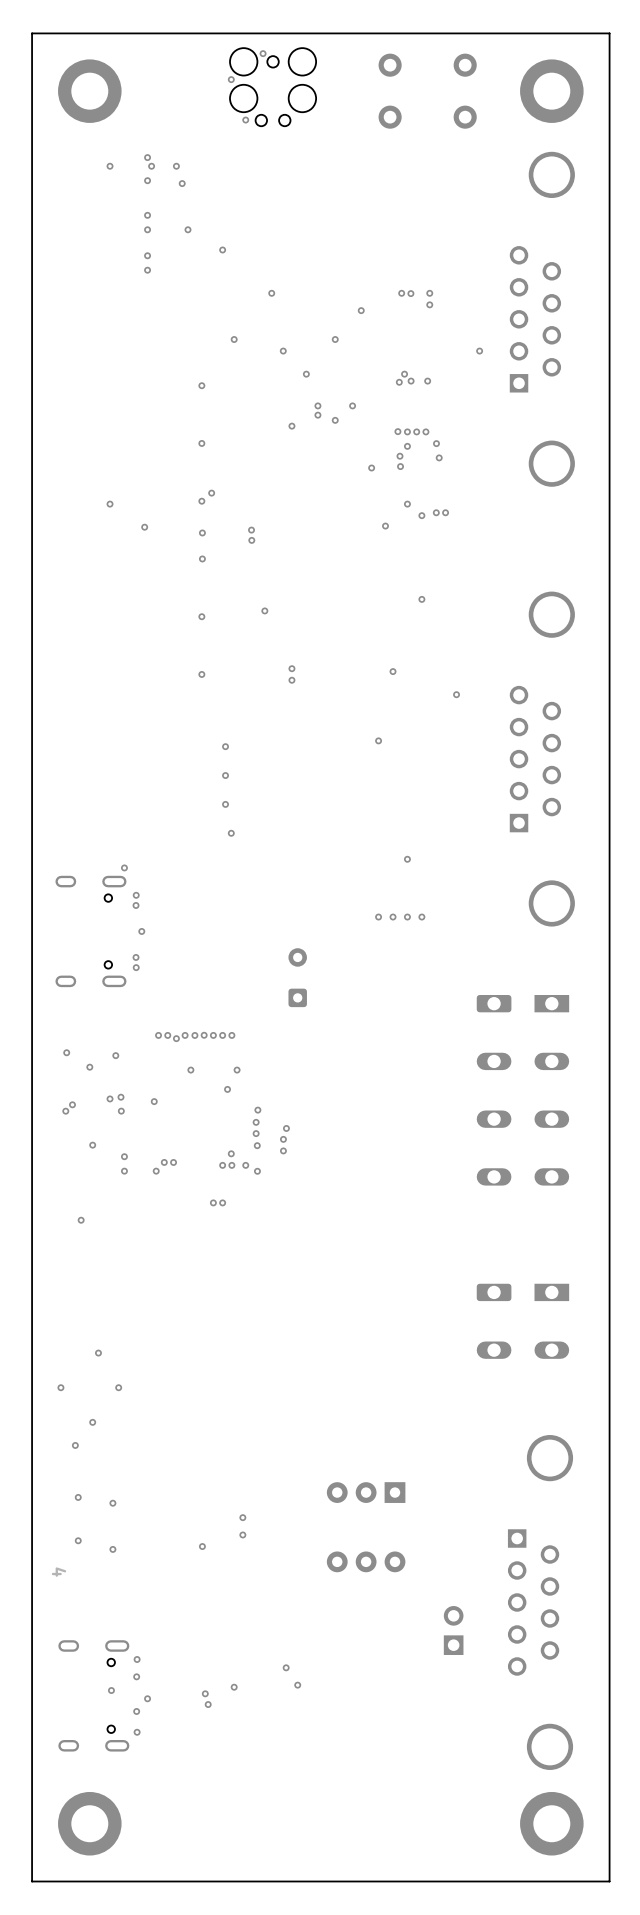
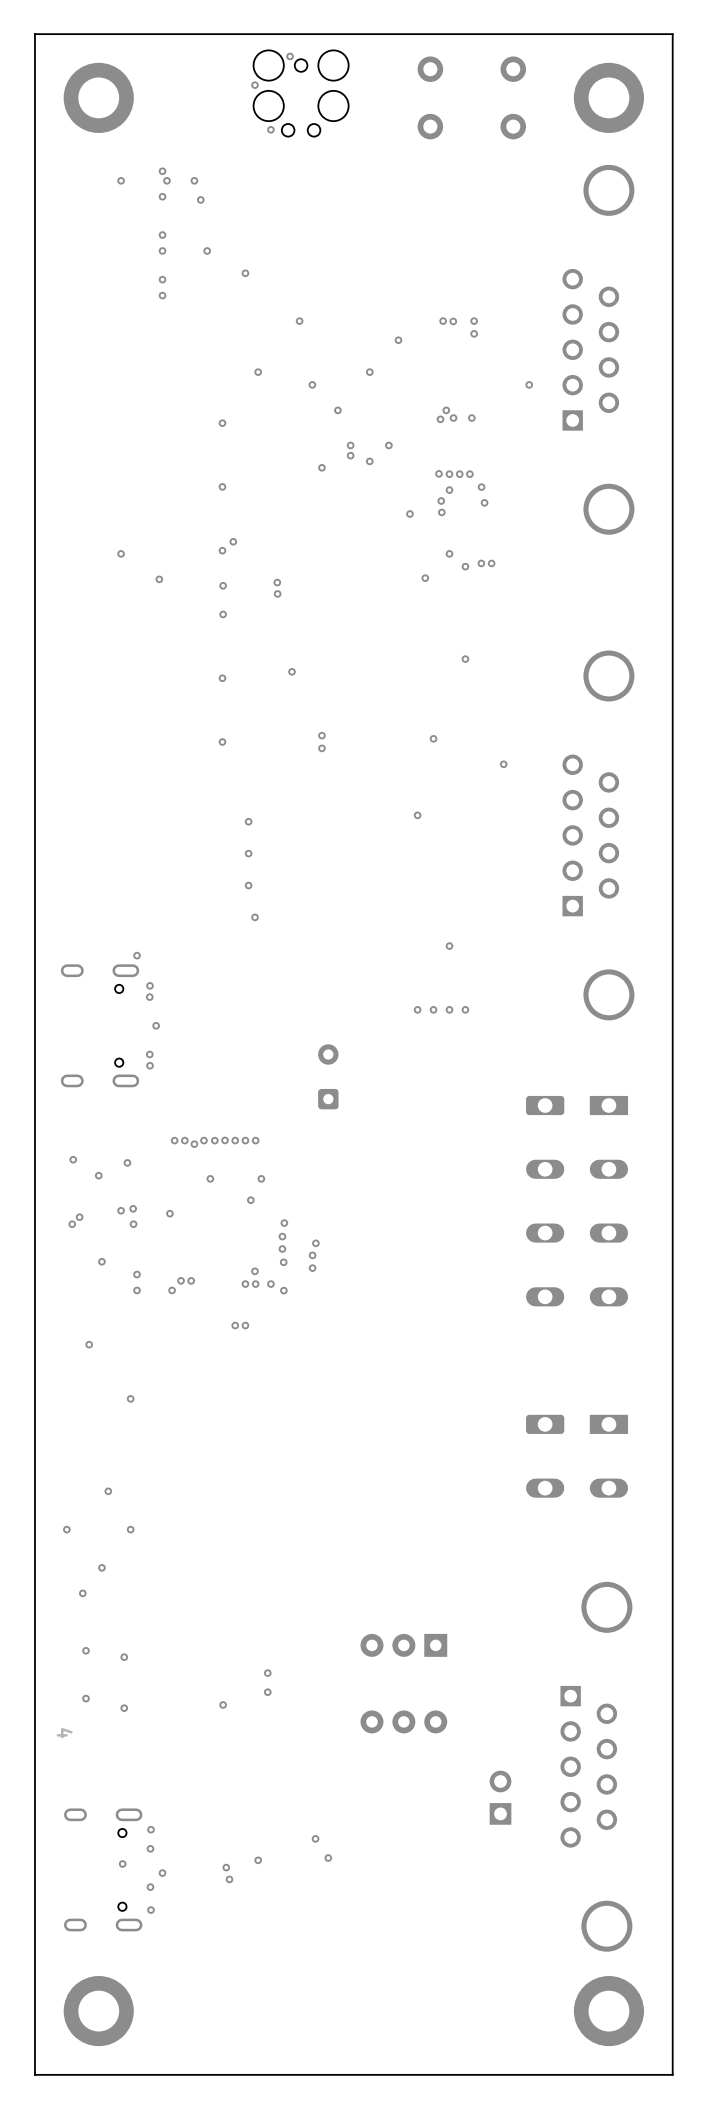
via: none -> (130, 1398)

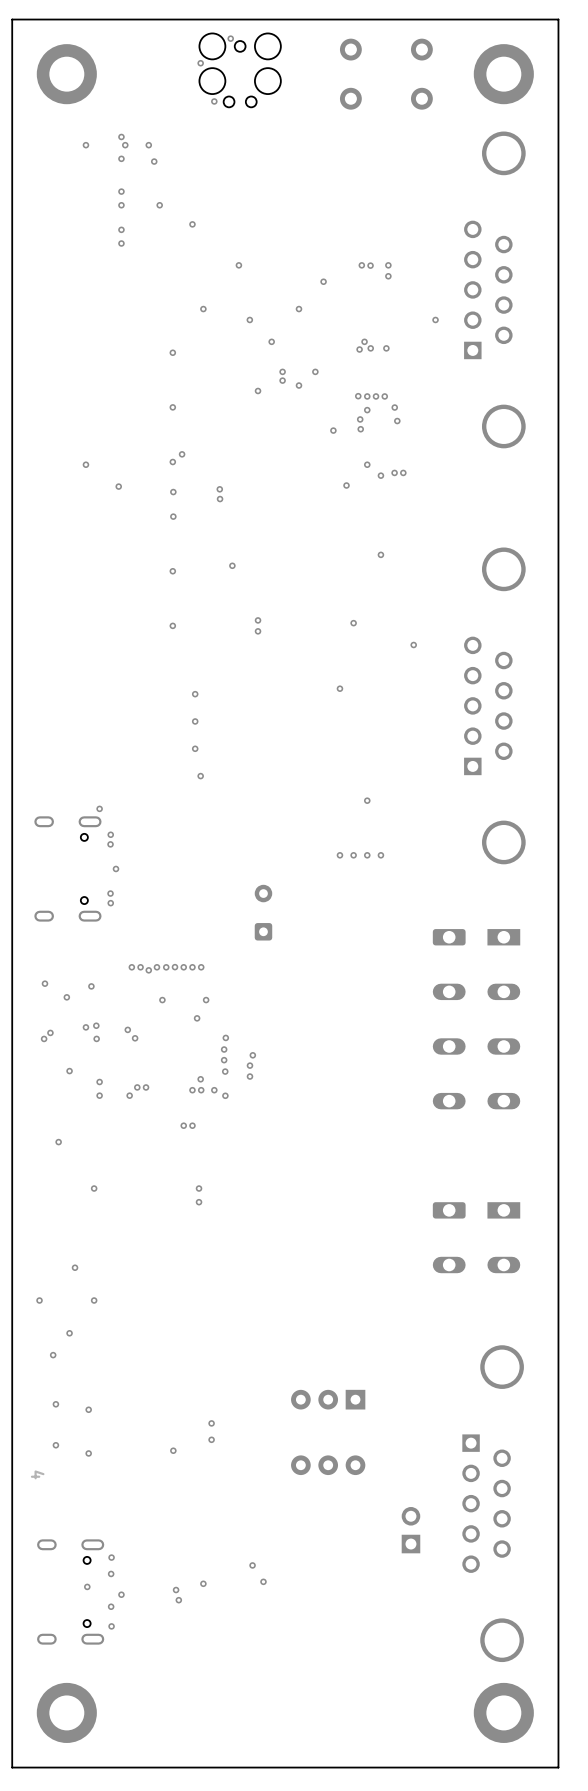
via: none -> (135, 1038)
via: none -> (199, 1188)
via: none -> (199, 1202)

